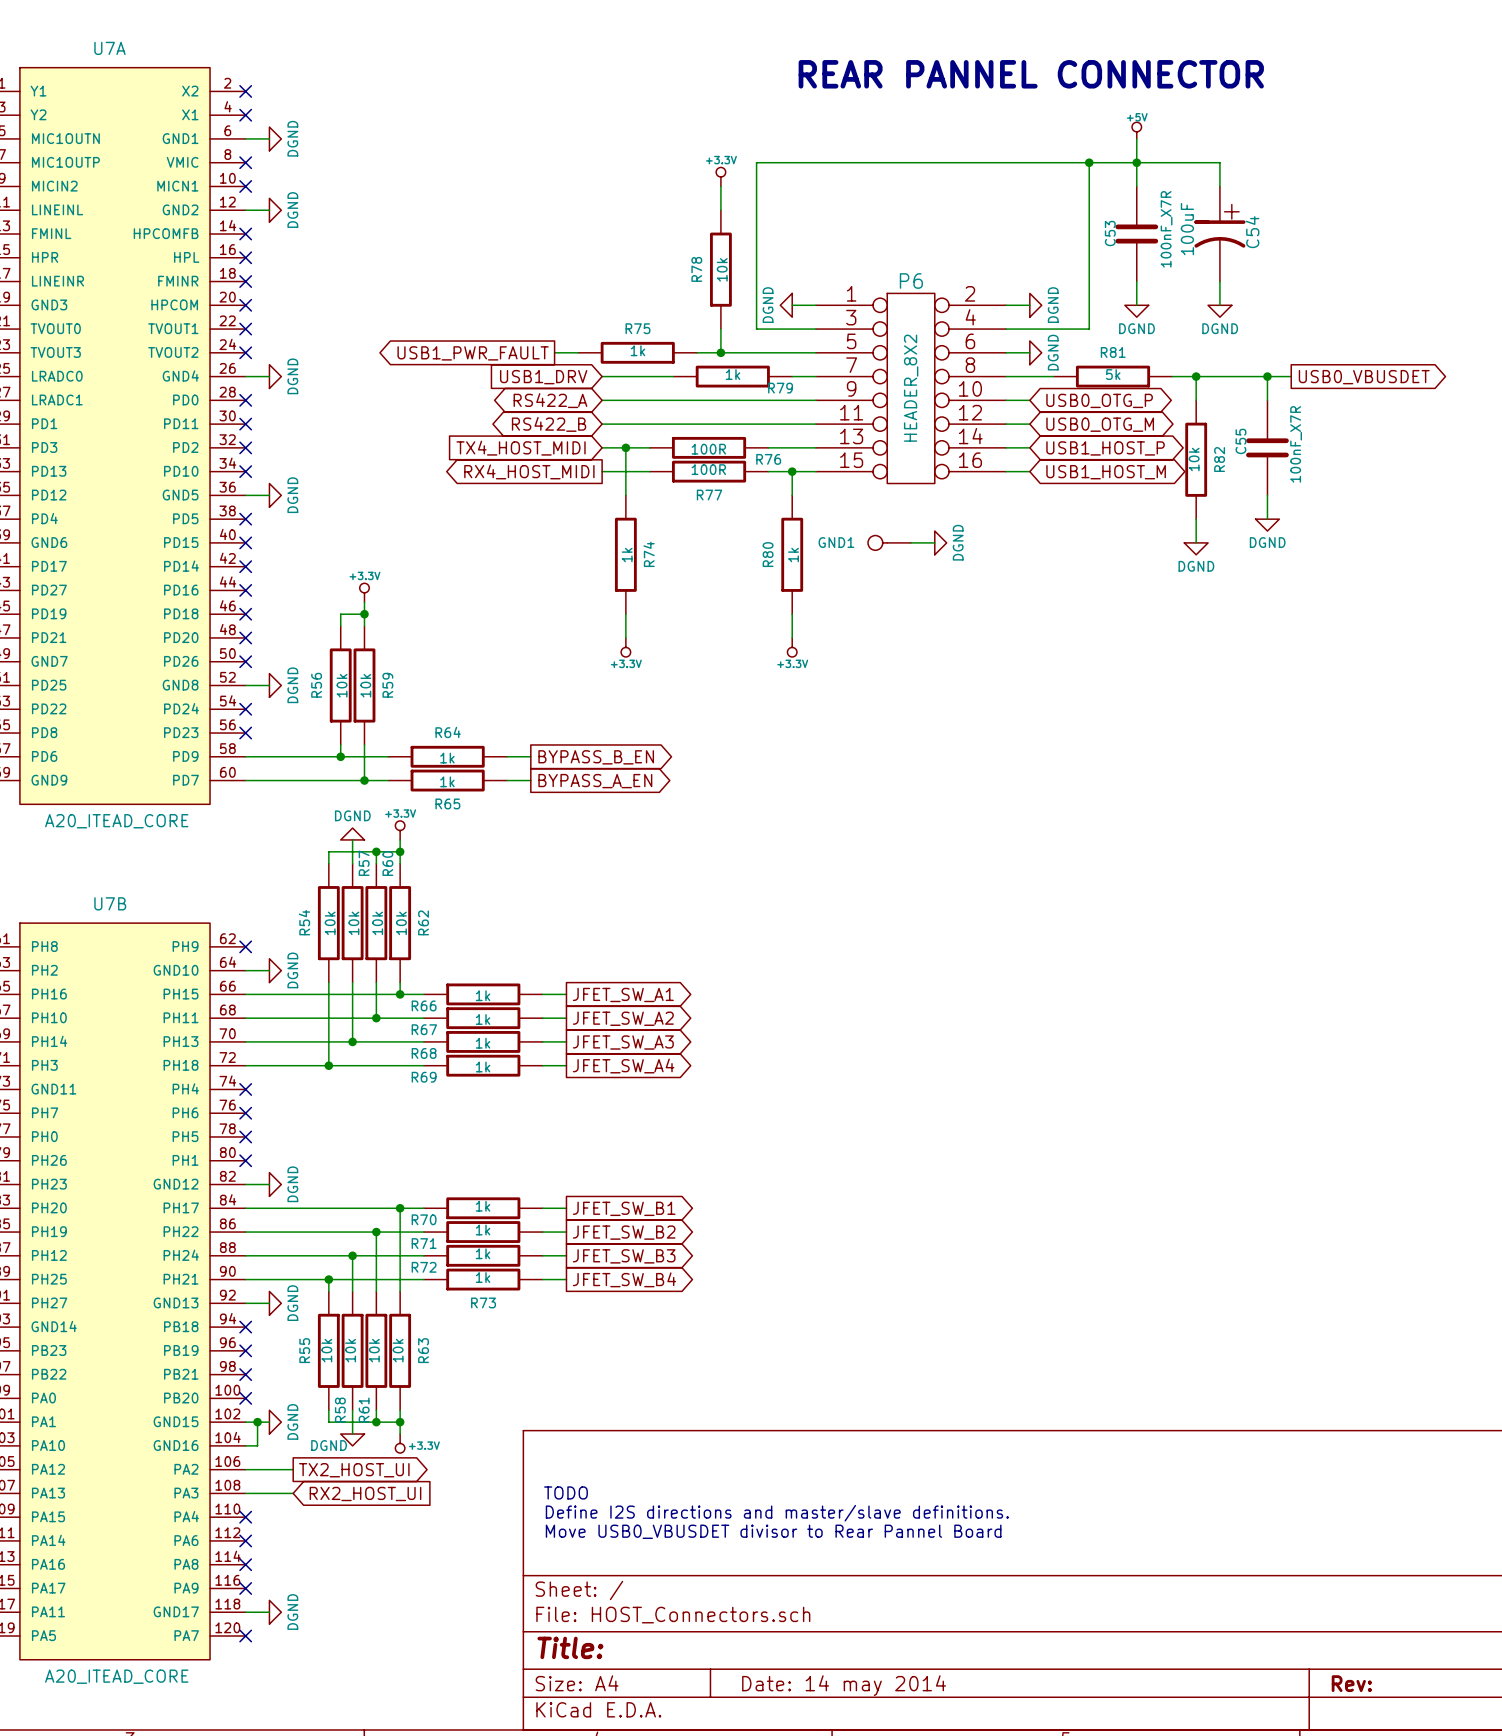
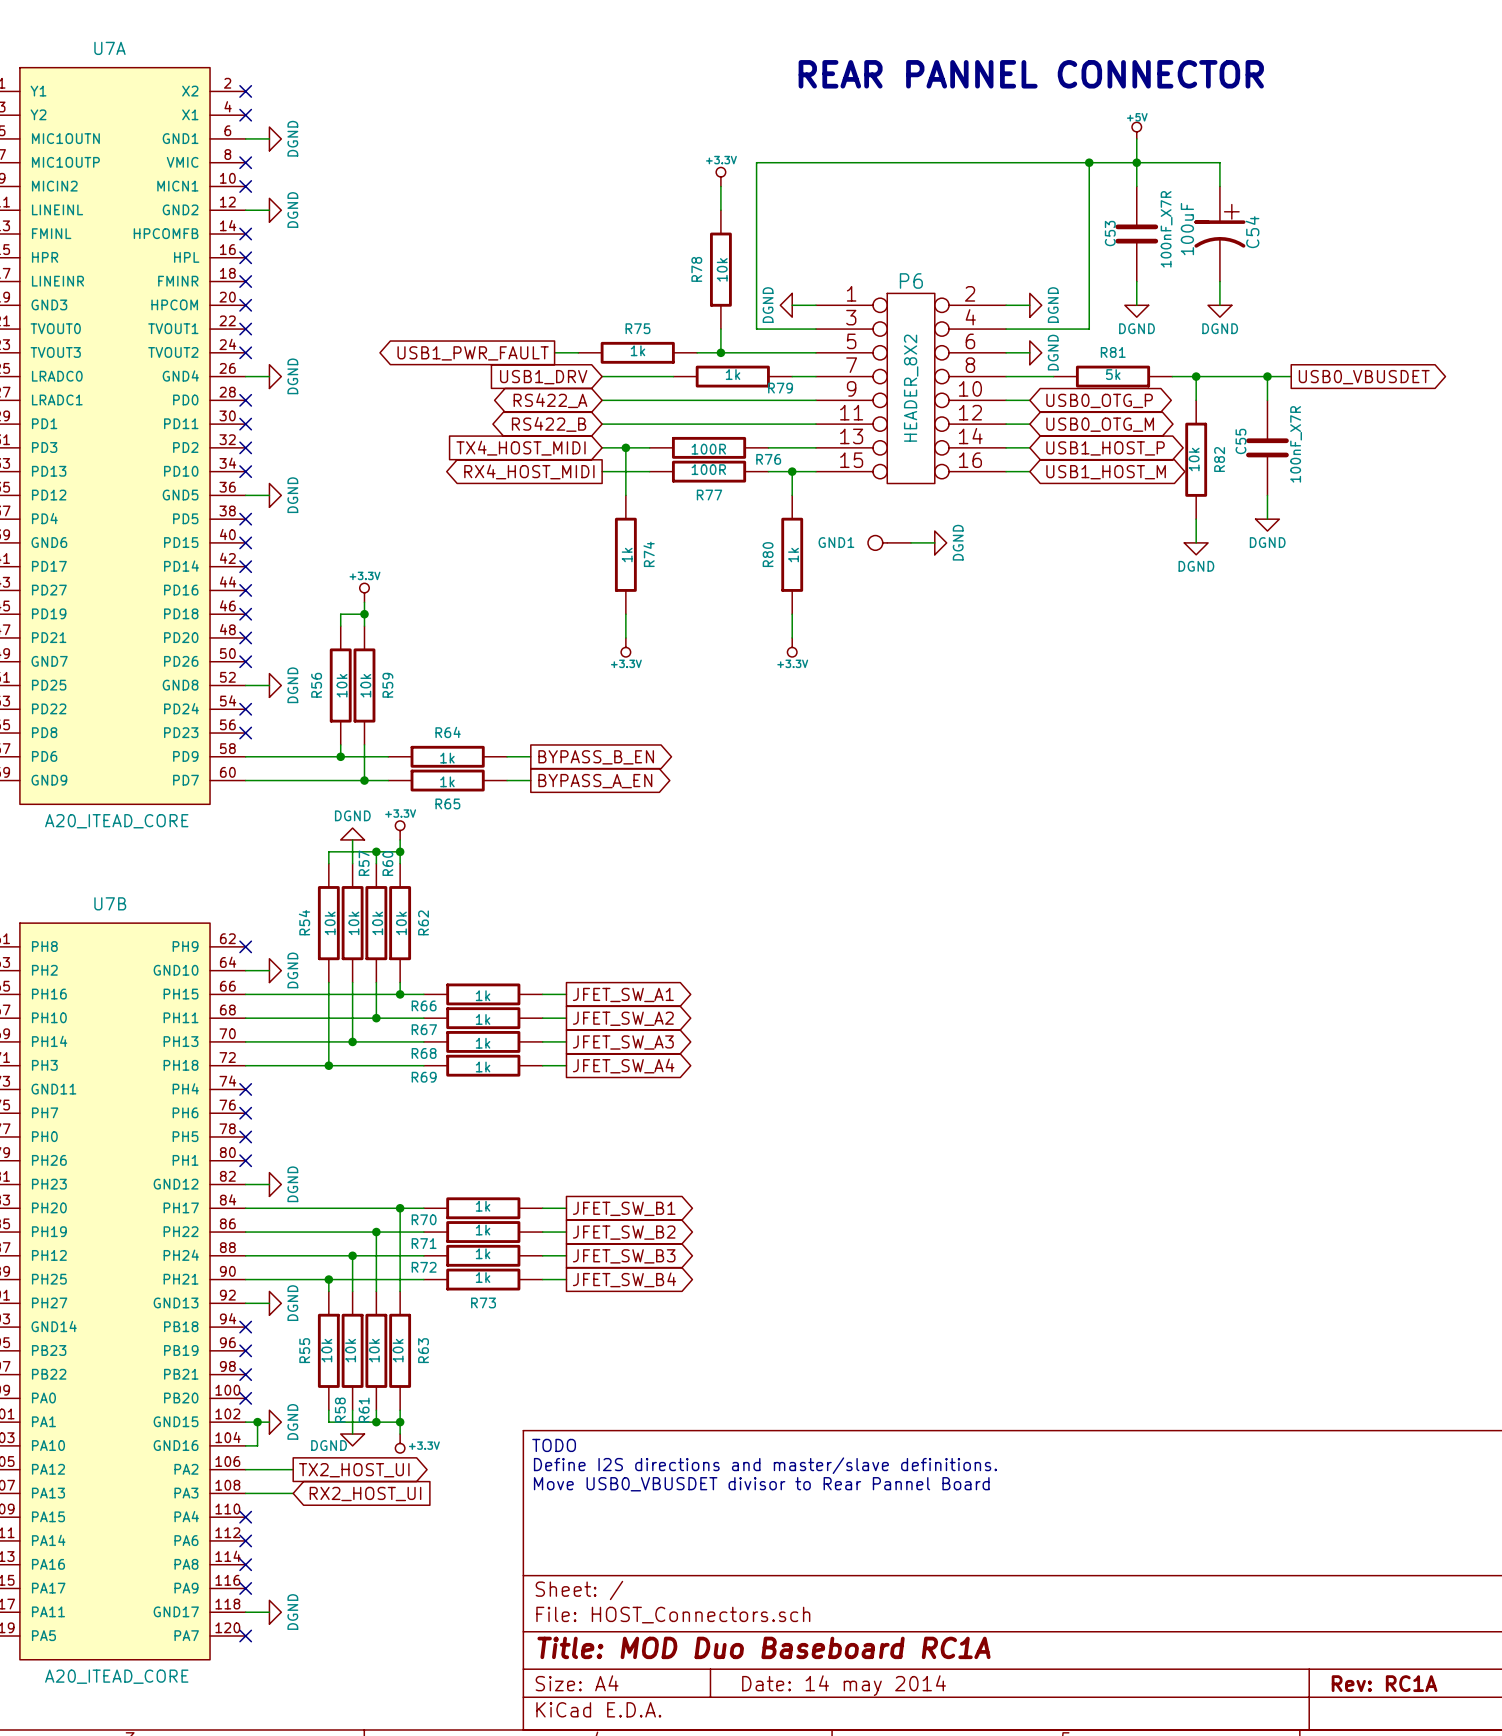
text position: TODO (565, 1492) -> TODO (554, 1445)
text position: Define I2S directions and master/slave definitions. (777, 1513) -> Define I2S directions and master/slave definitions. (765, 1465)
text position: Move USB0_VBUSDET divisor to Rear Pannel Board (773, 1531) -> Move USB0_VBUSDET divisor to Rear Pannel Board (761, 1484)
title block: Title: (570, 1647) -> Title: MOD Duo Baseboard RC1A (763, 1647)
title block: Rev: (1351, 1683) -> Rev: RC1A (1384, 1683)

